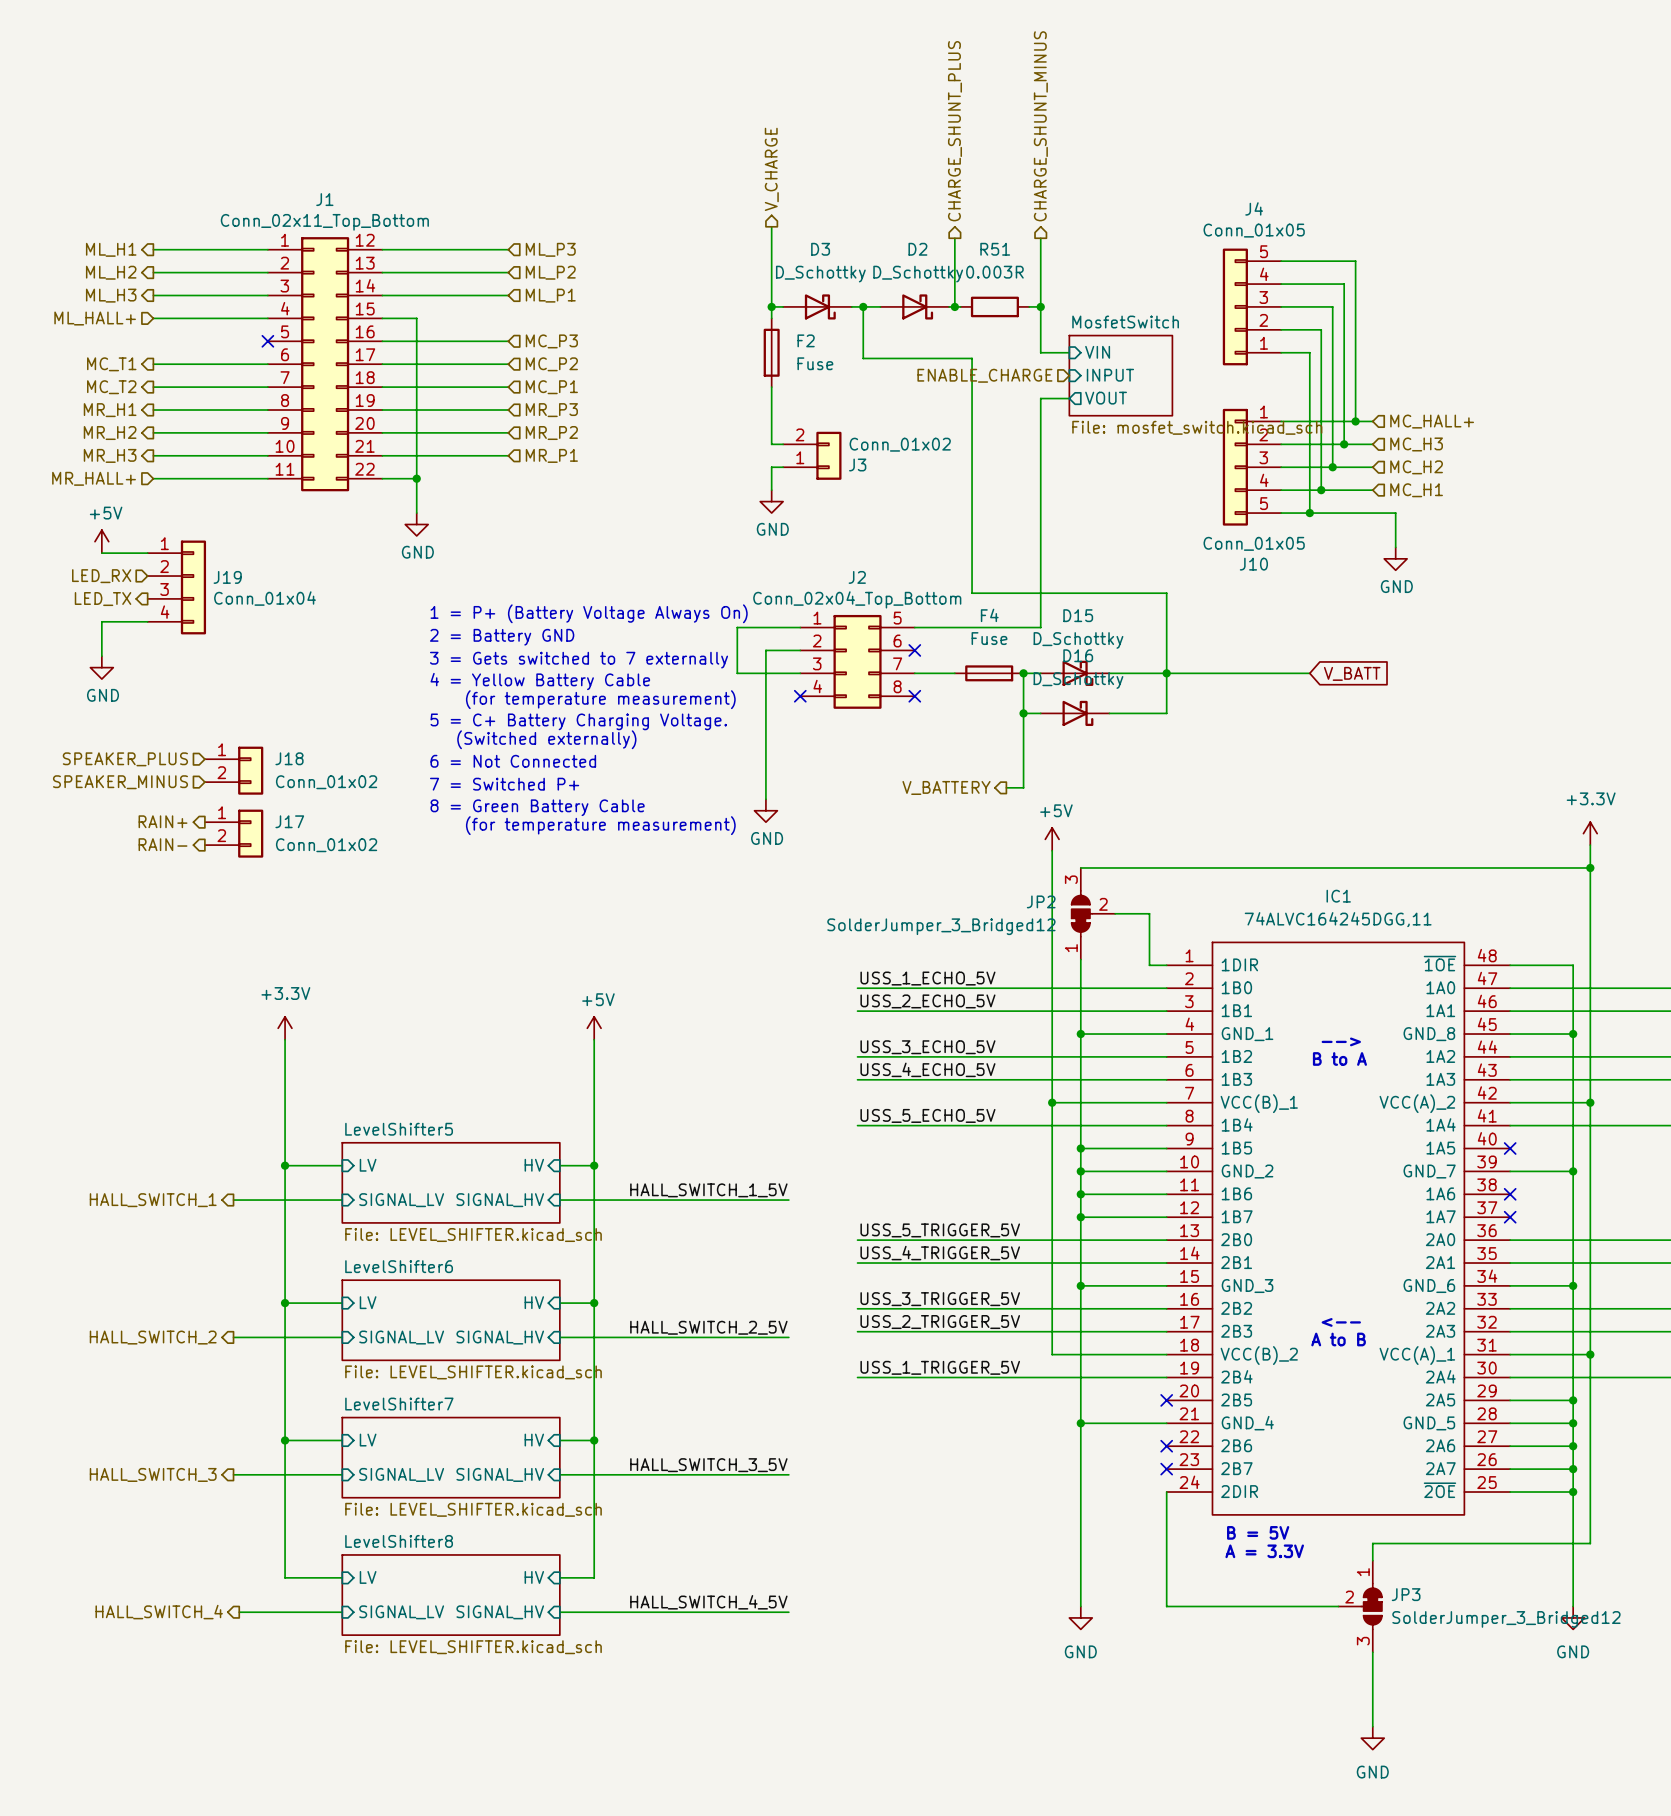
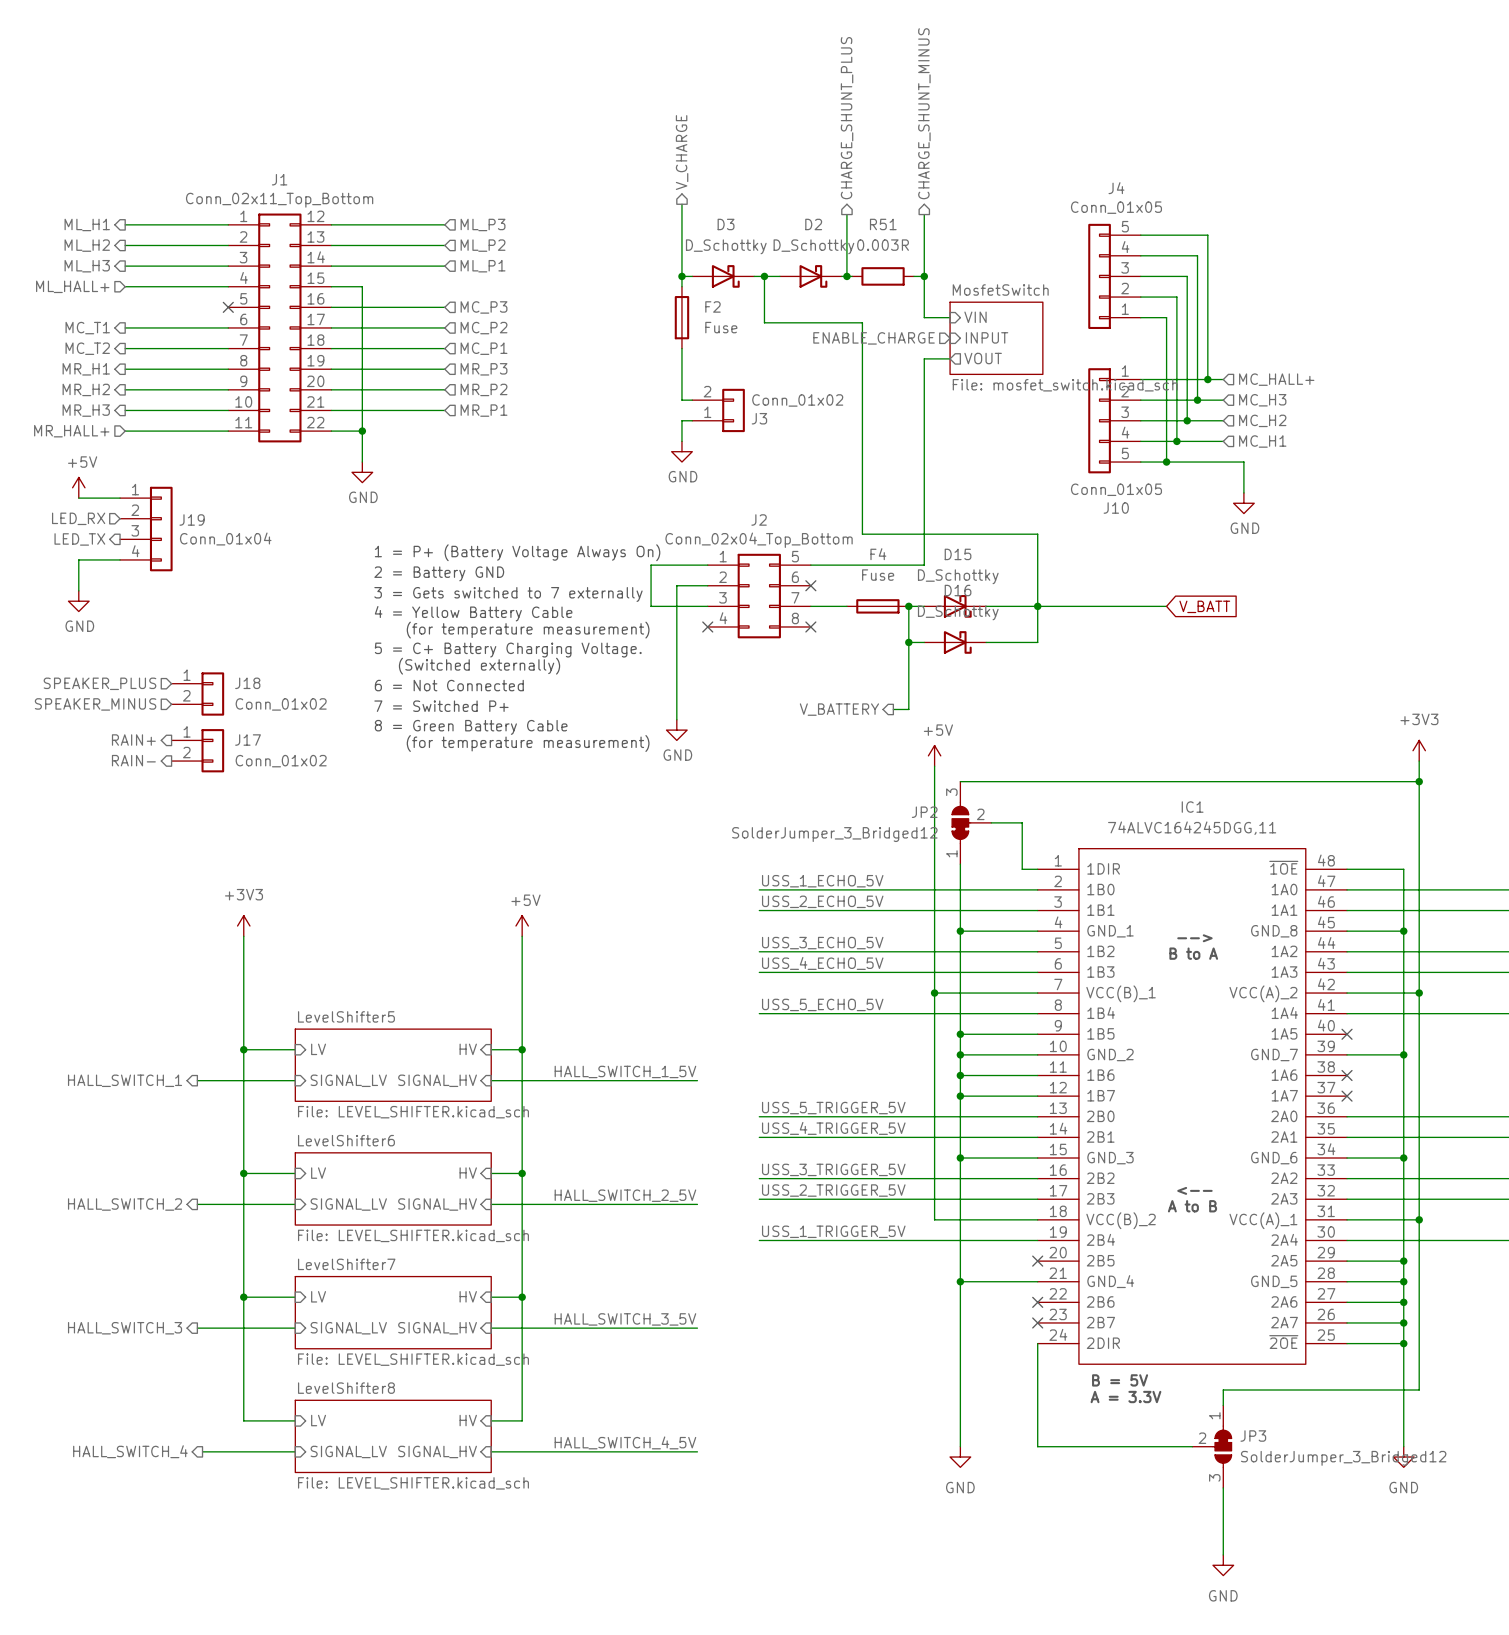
power symbol: +3.3V (1590, 833) -> +3V3 (1419, 750)
power symbol: +3.3V (285, 1028) -> +3V3 (243, 926)

